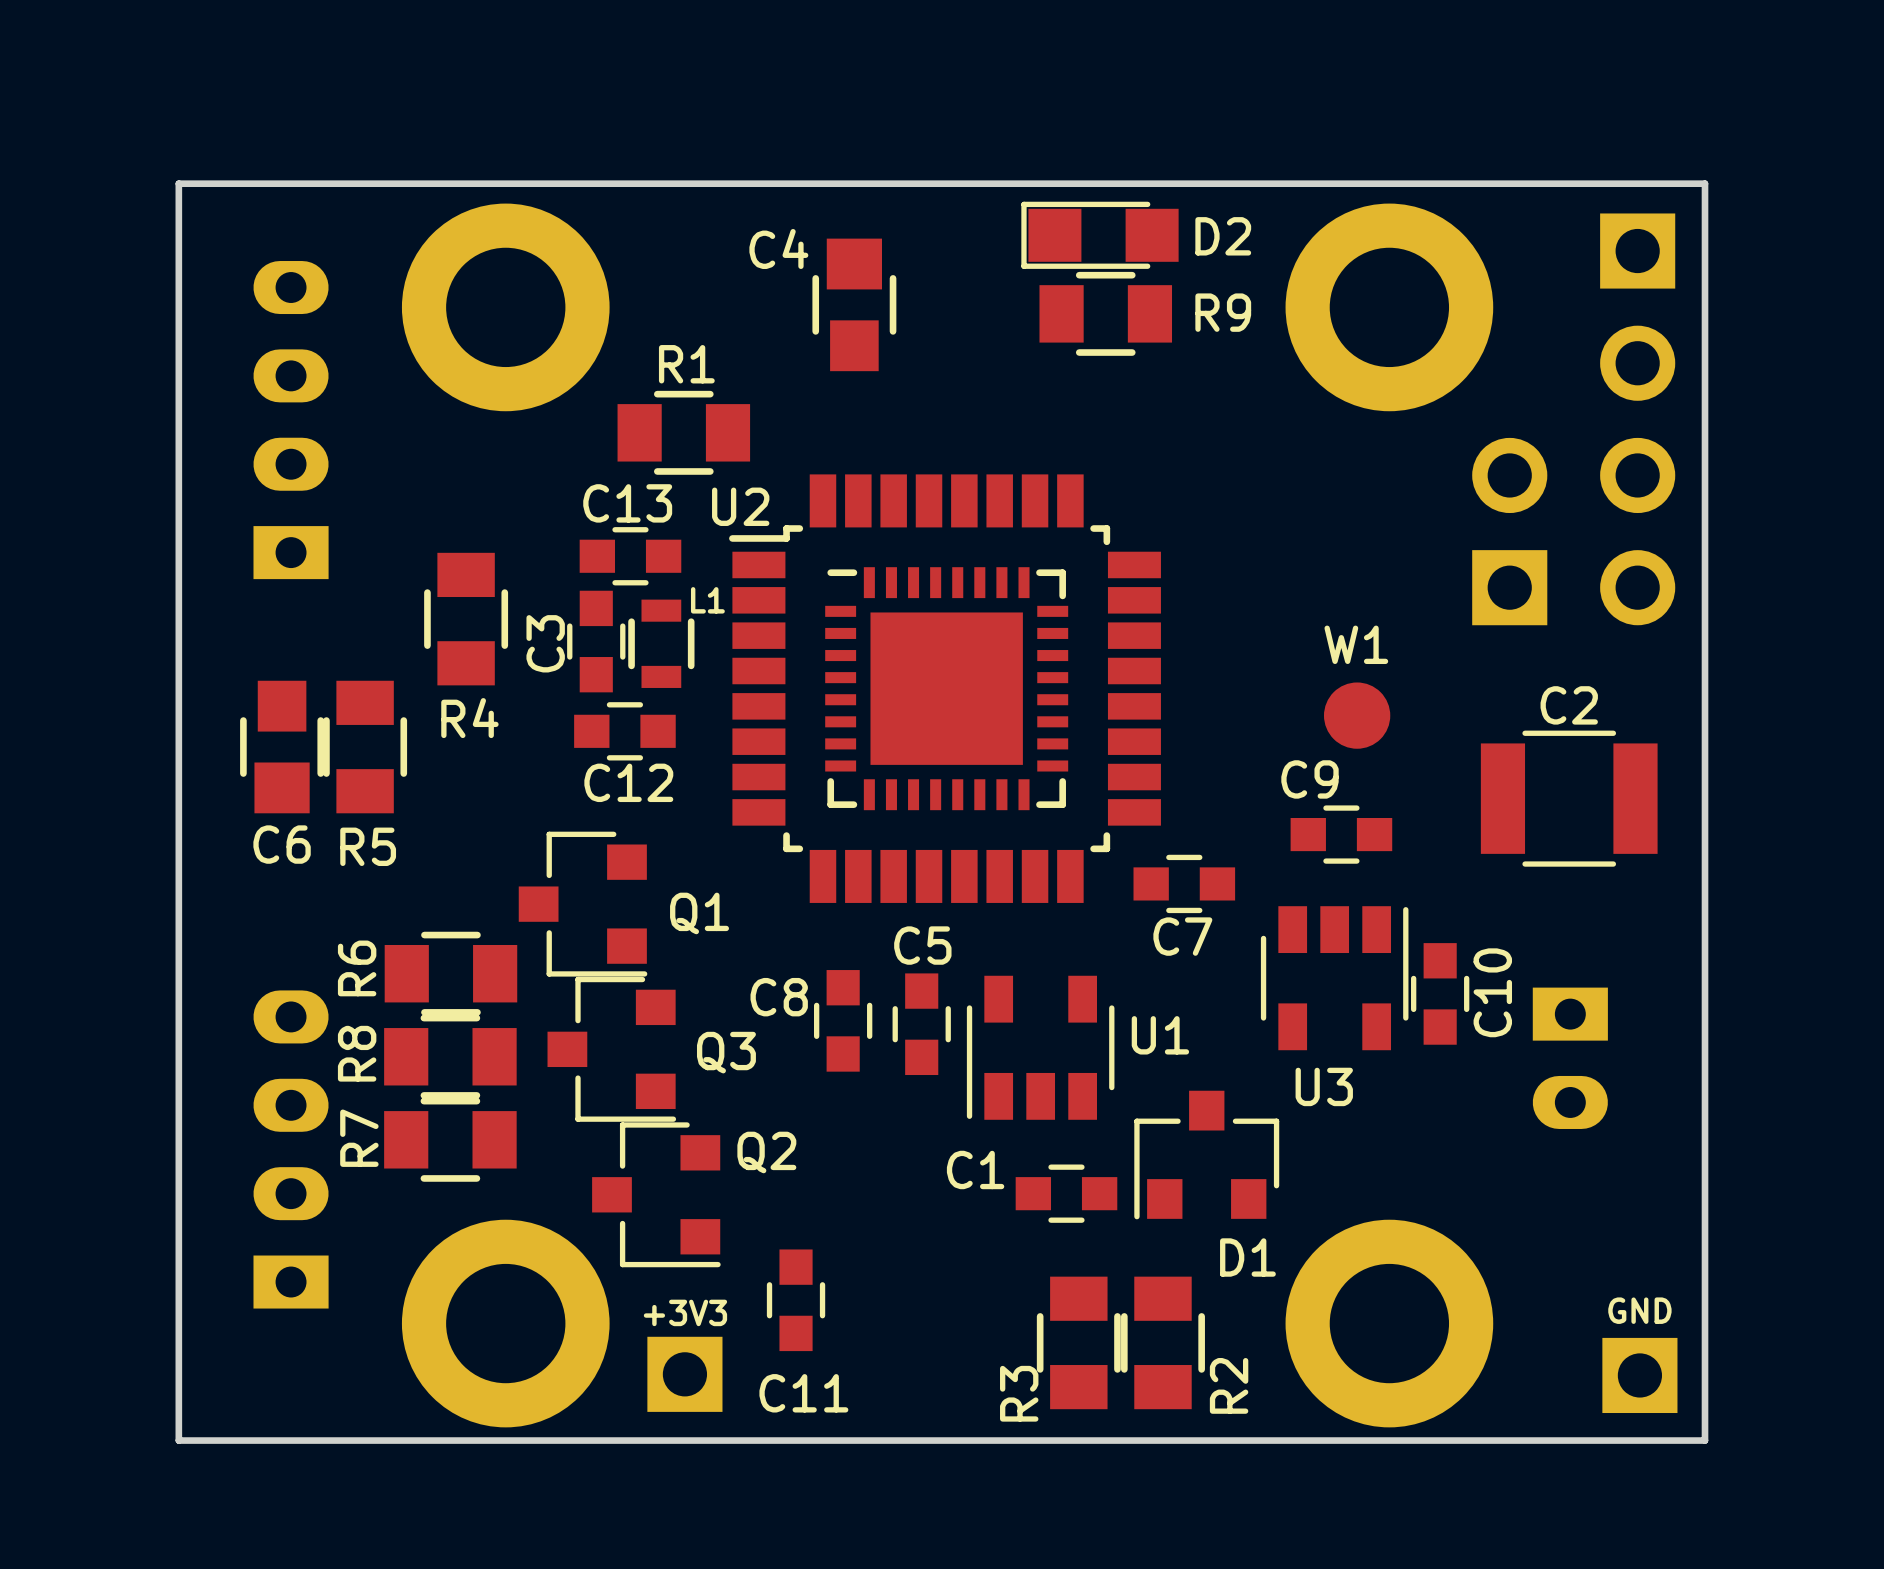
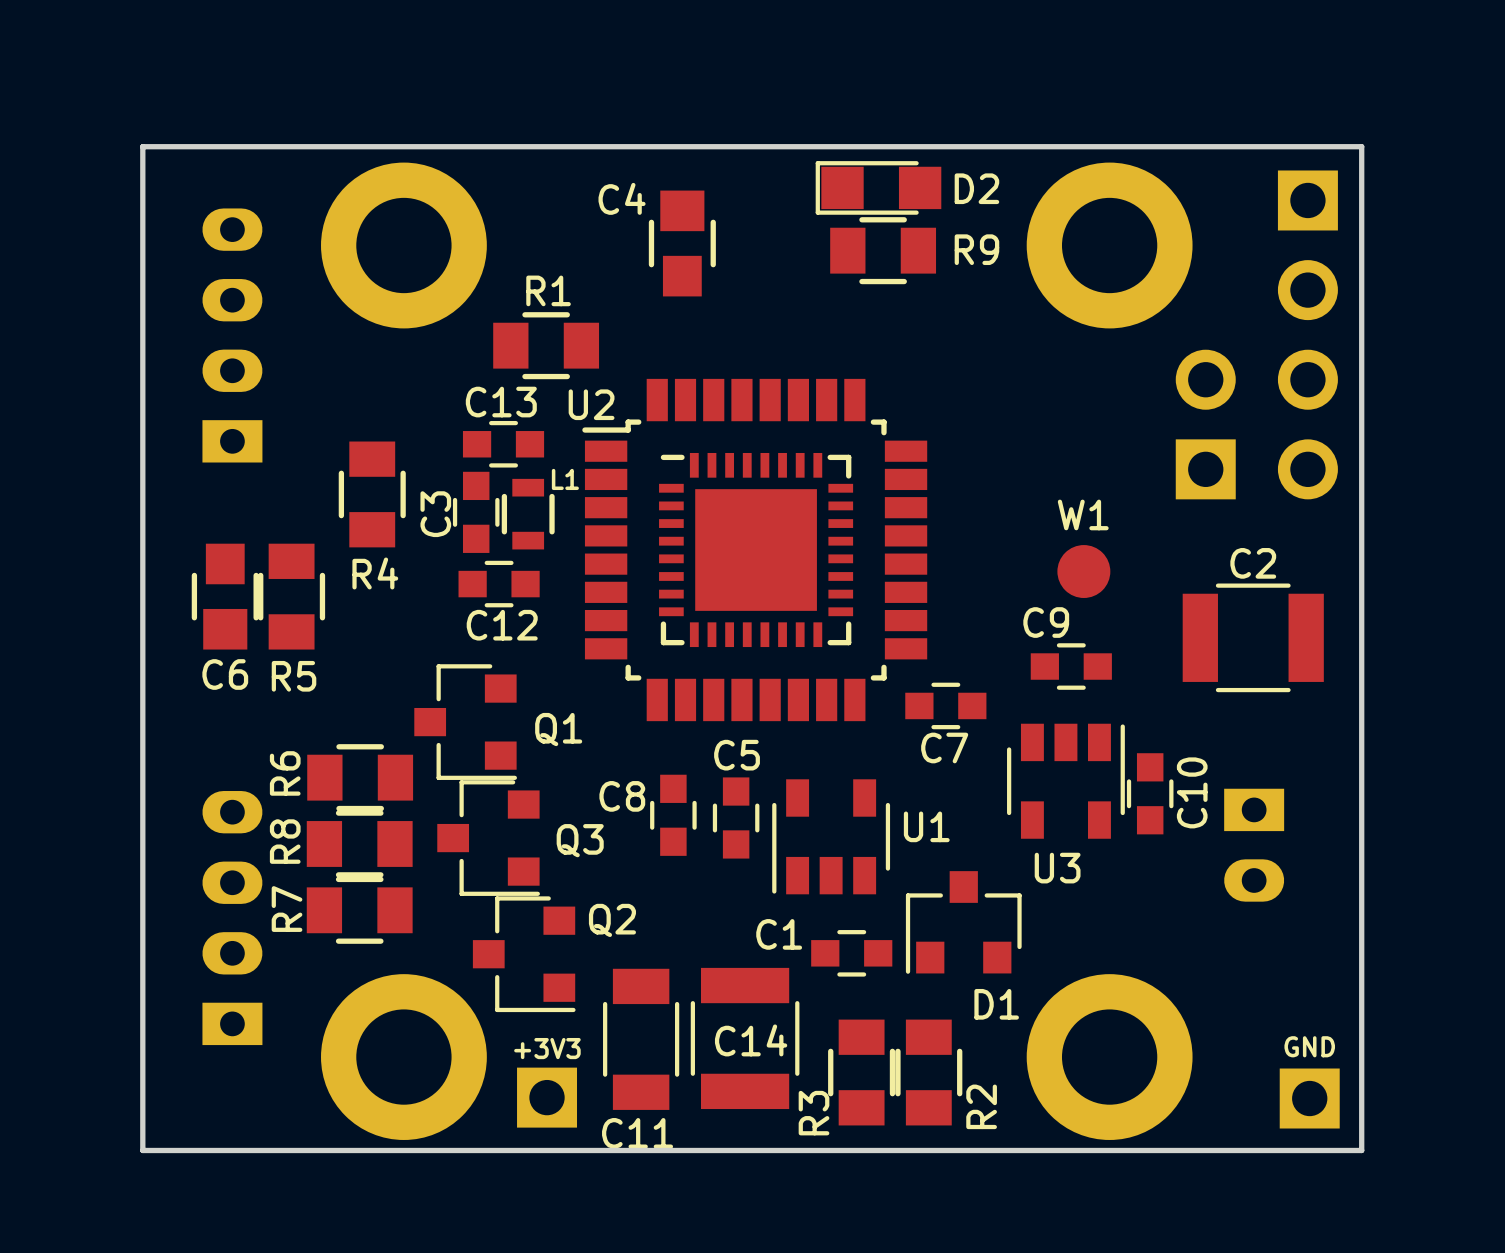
C11 footprint: [766, 1249, 826, 1352] -> [603, 968, 680, 1110]
C14: none -> (745, 1038)

